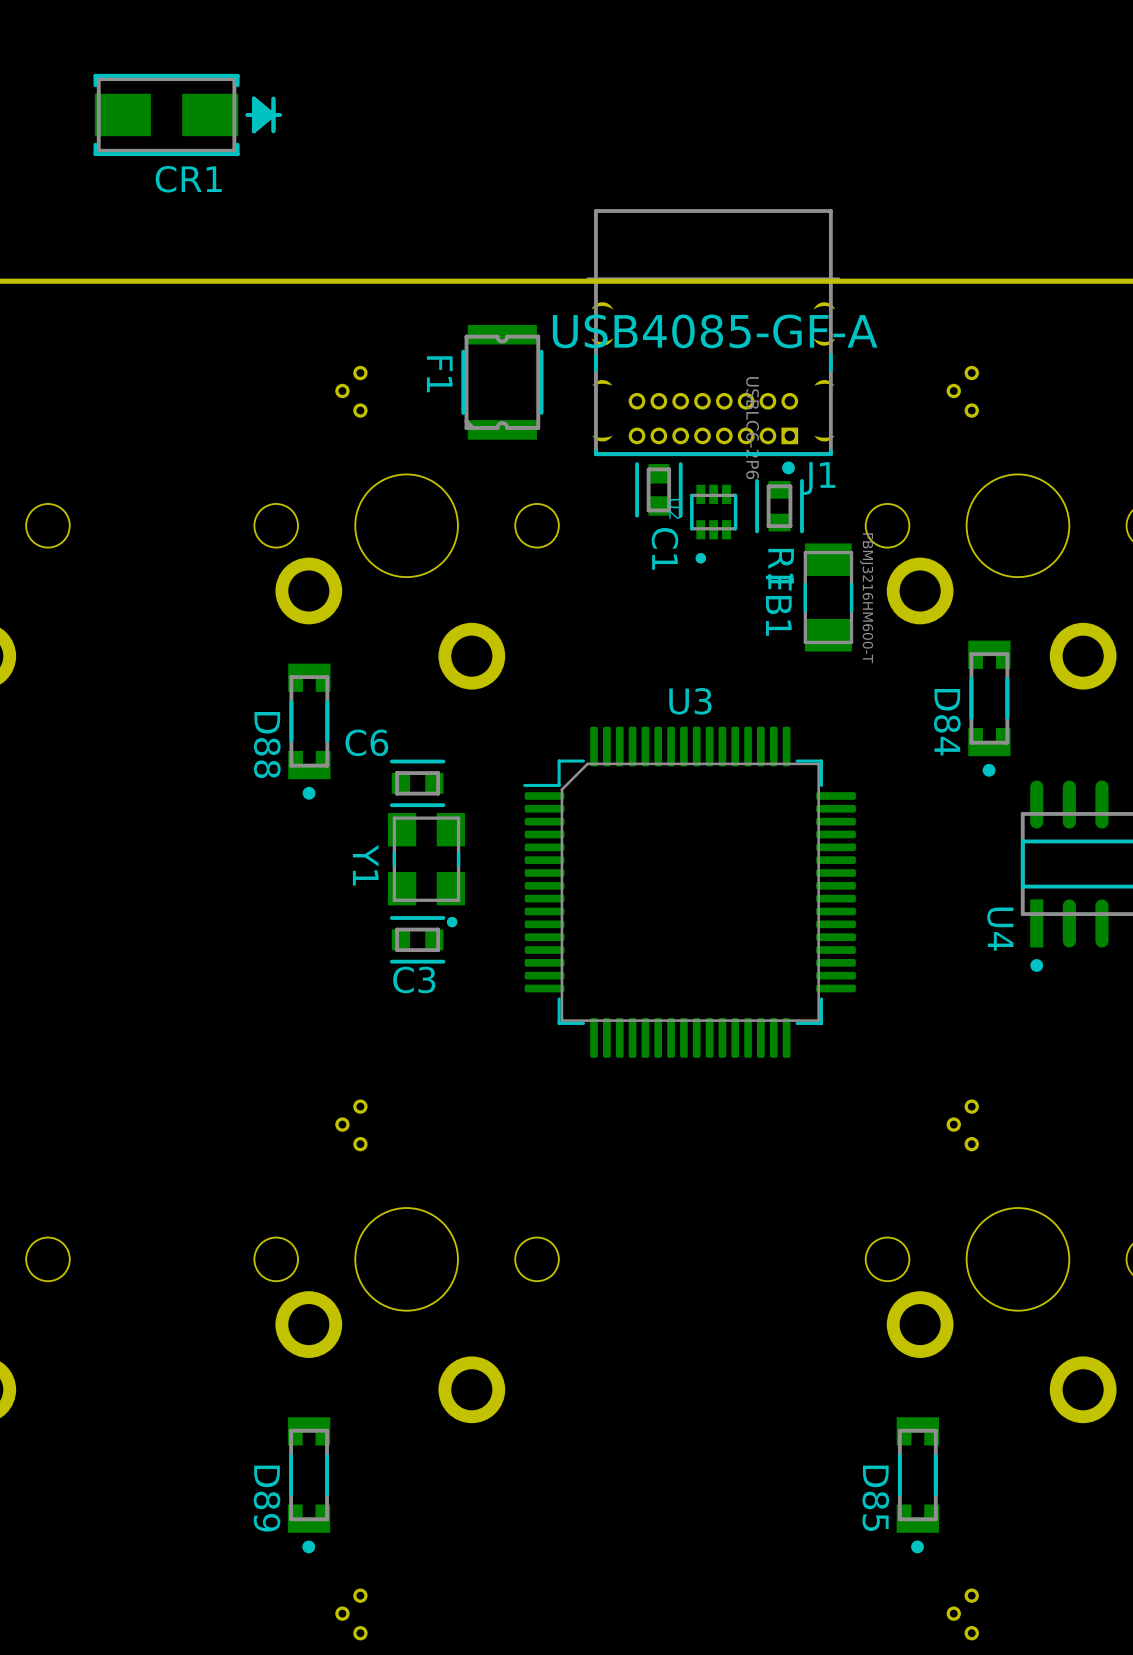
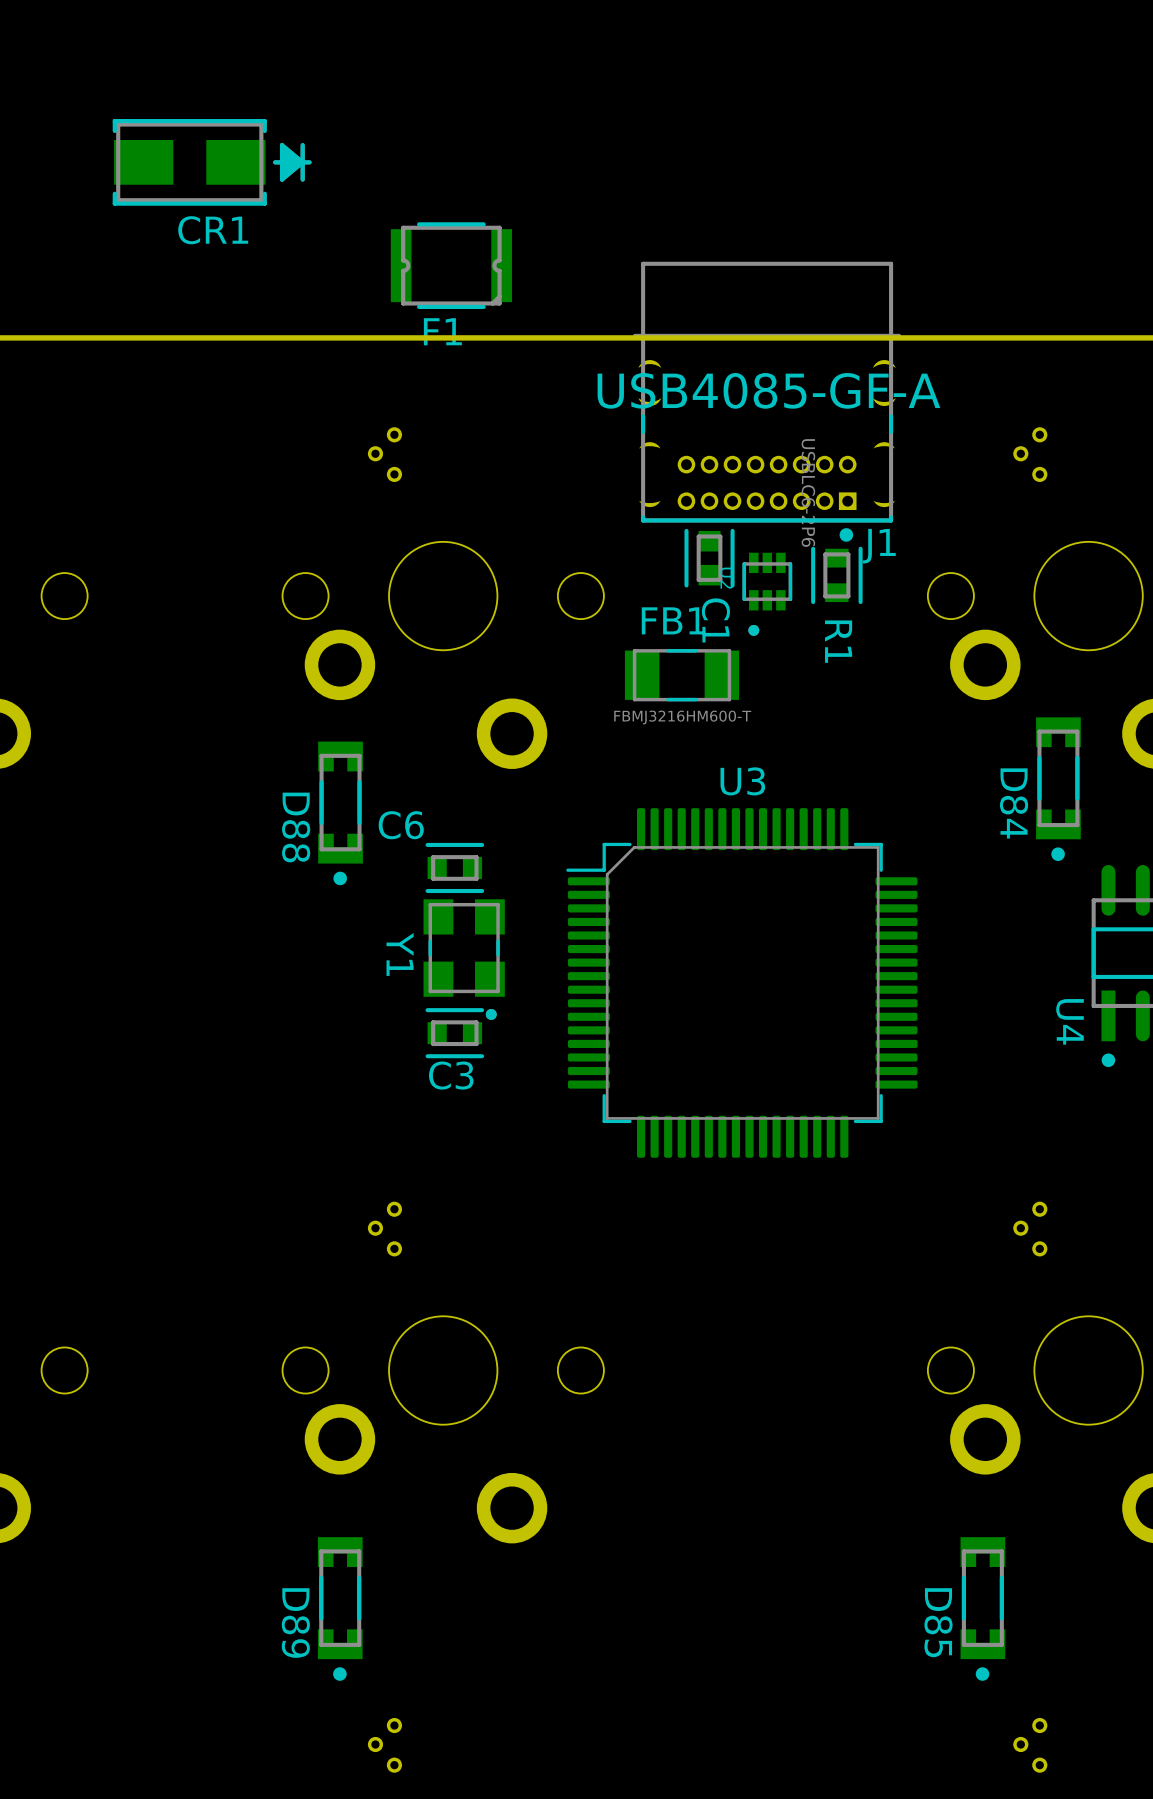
F1 rotation: 0° (502, 382) -> 90° counterclockwise (451, 265)
F1 position: (502, 382) -> (451, 265)
FB1 rotation: 0° (828, 597) -> 90° clockwise (681, 675)
FB1 position: (828, 597) -> (681, 675)

